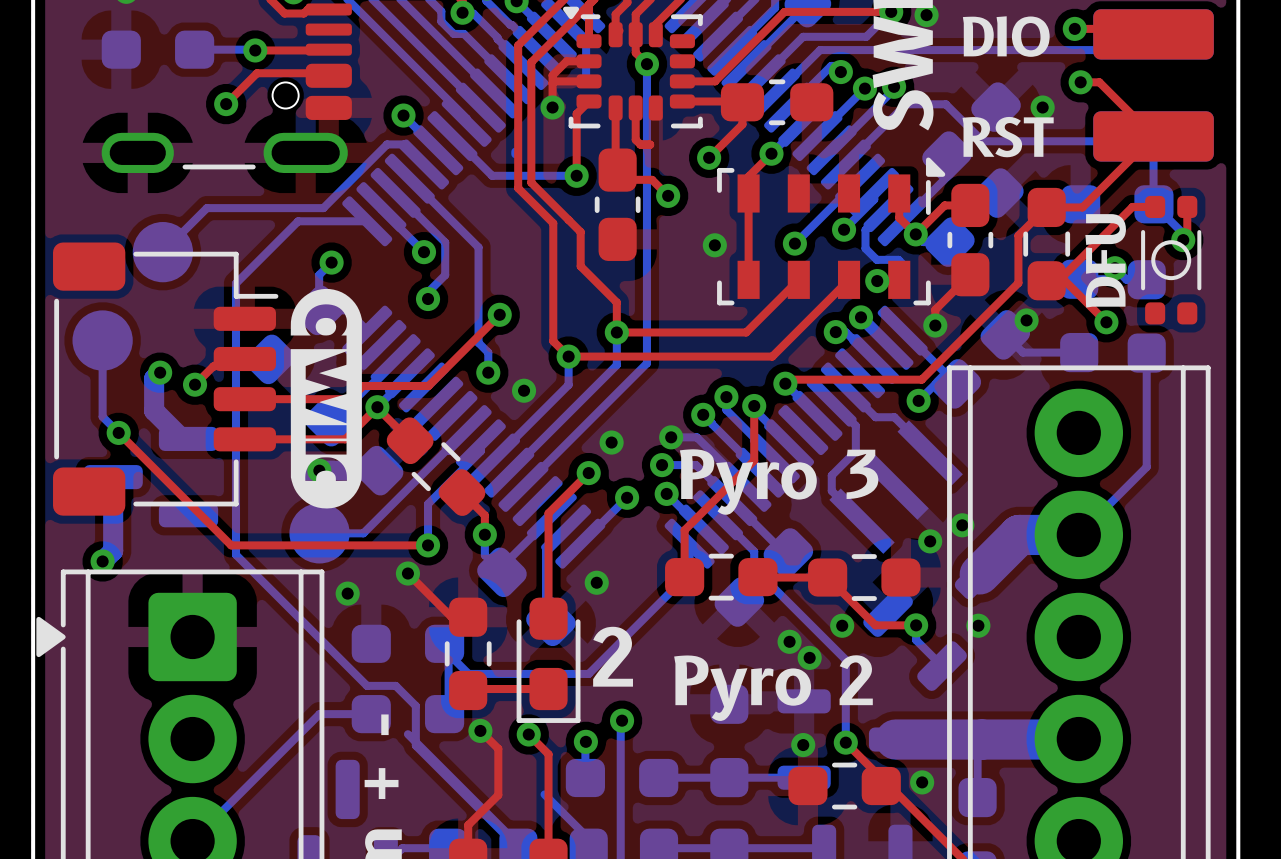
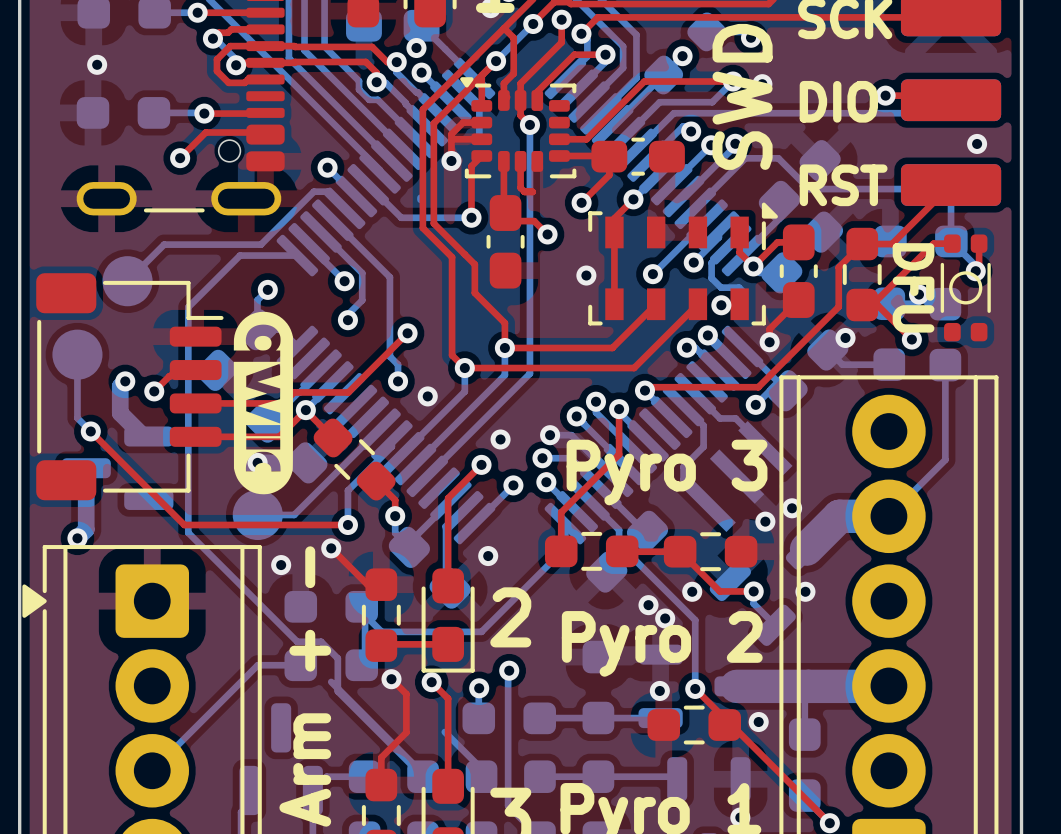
top track: (1080, 82) (1099, 82) (1153, 136) -> none
via: (1080, 82) -> none
via: none -> (977, 143)
via: (1042, 107) -> none
text rotation: 0° (1105, 260) -> 180° (913, 287)

